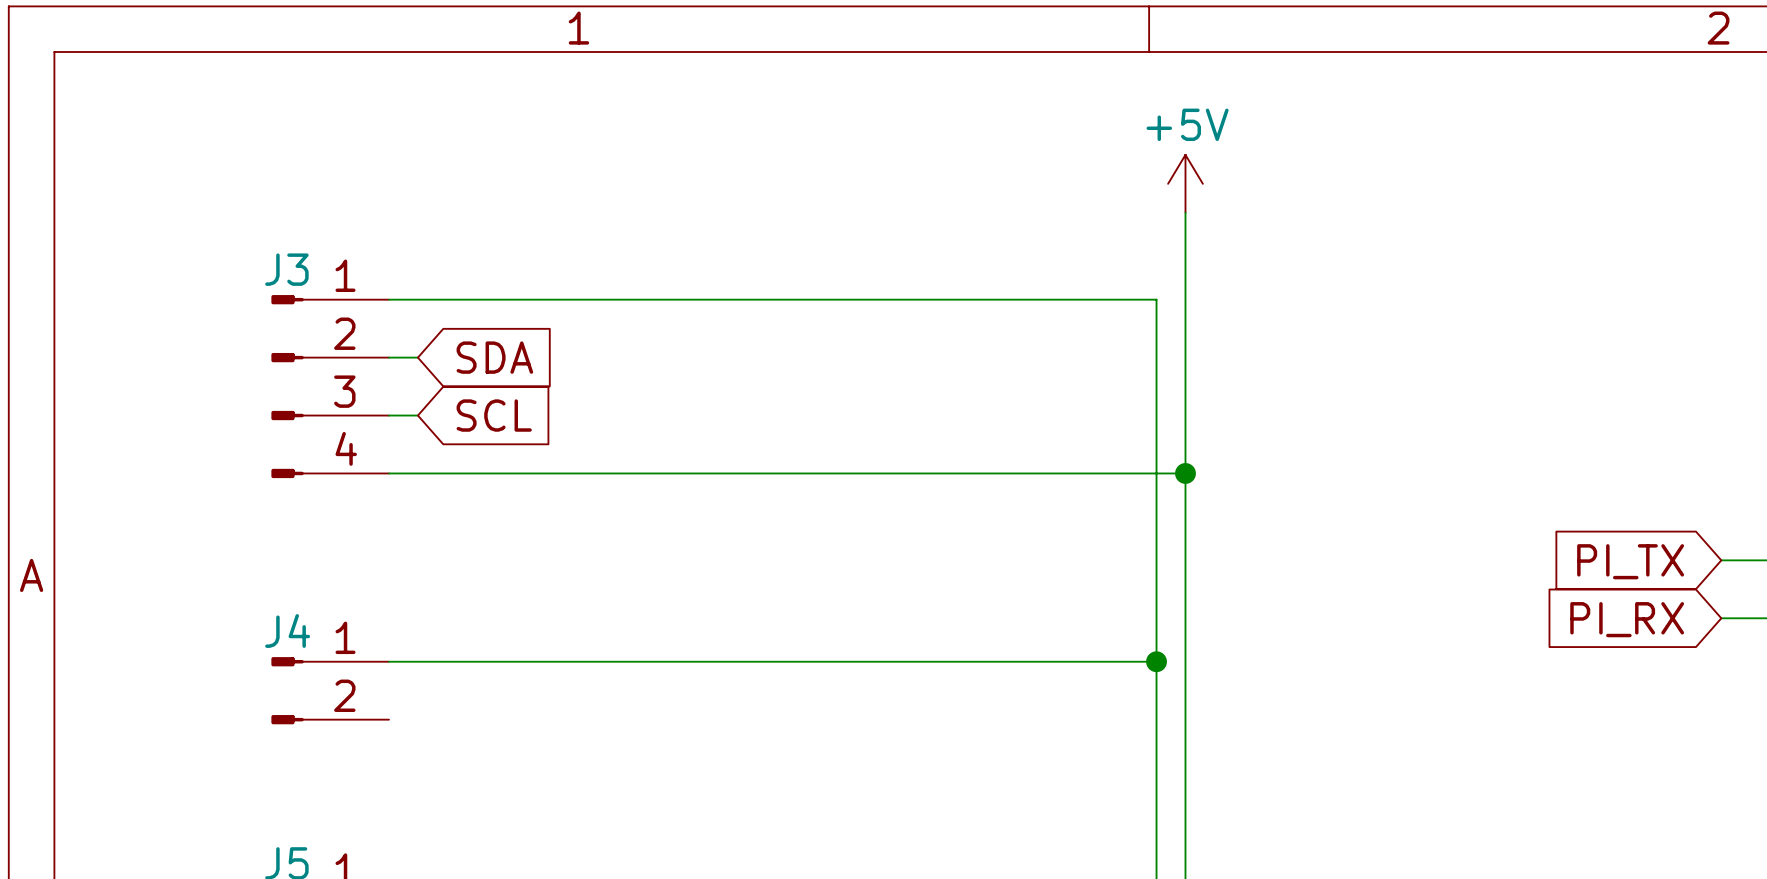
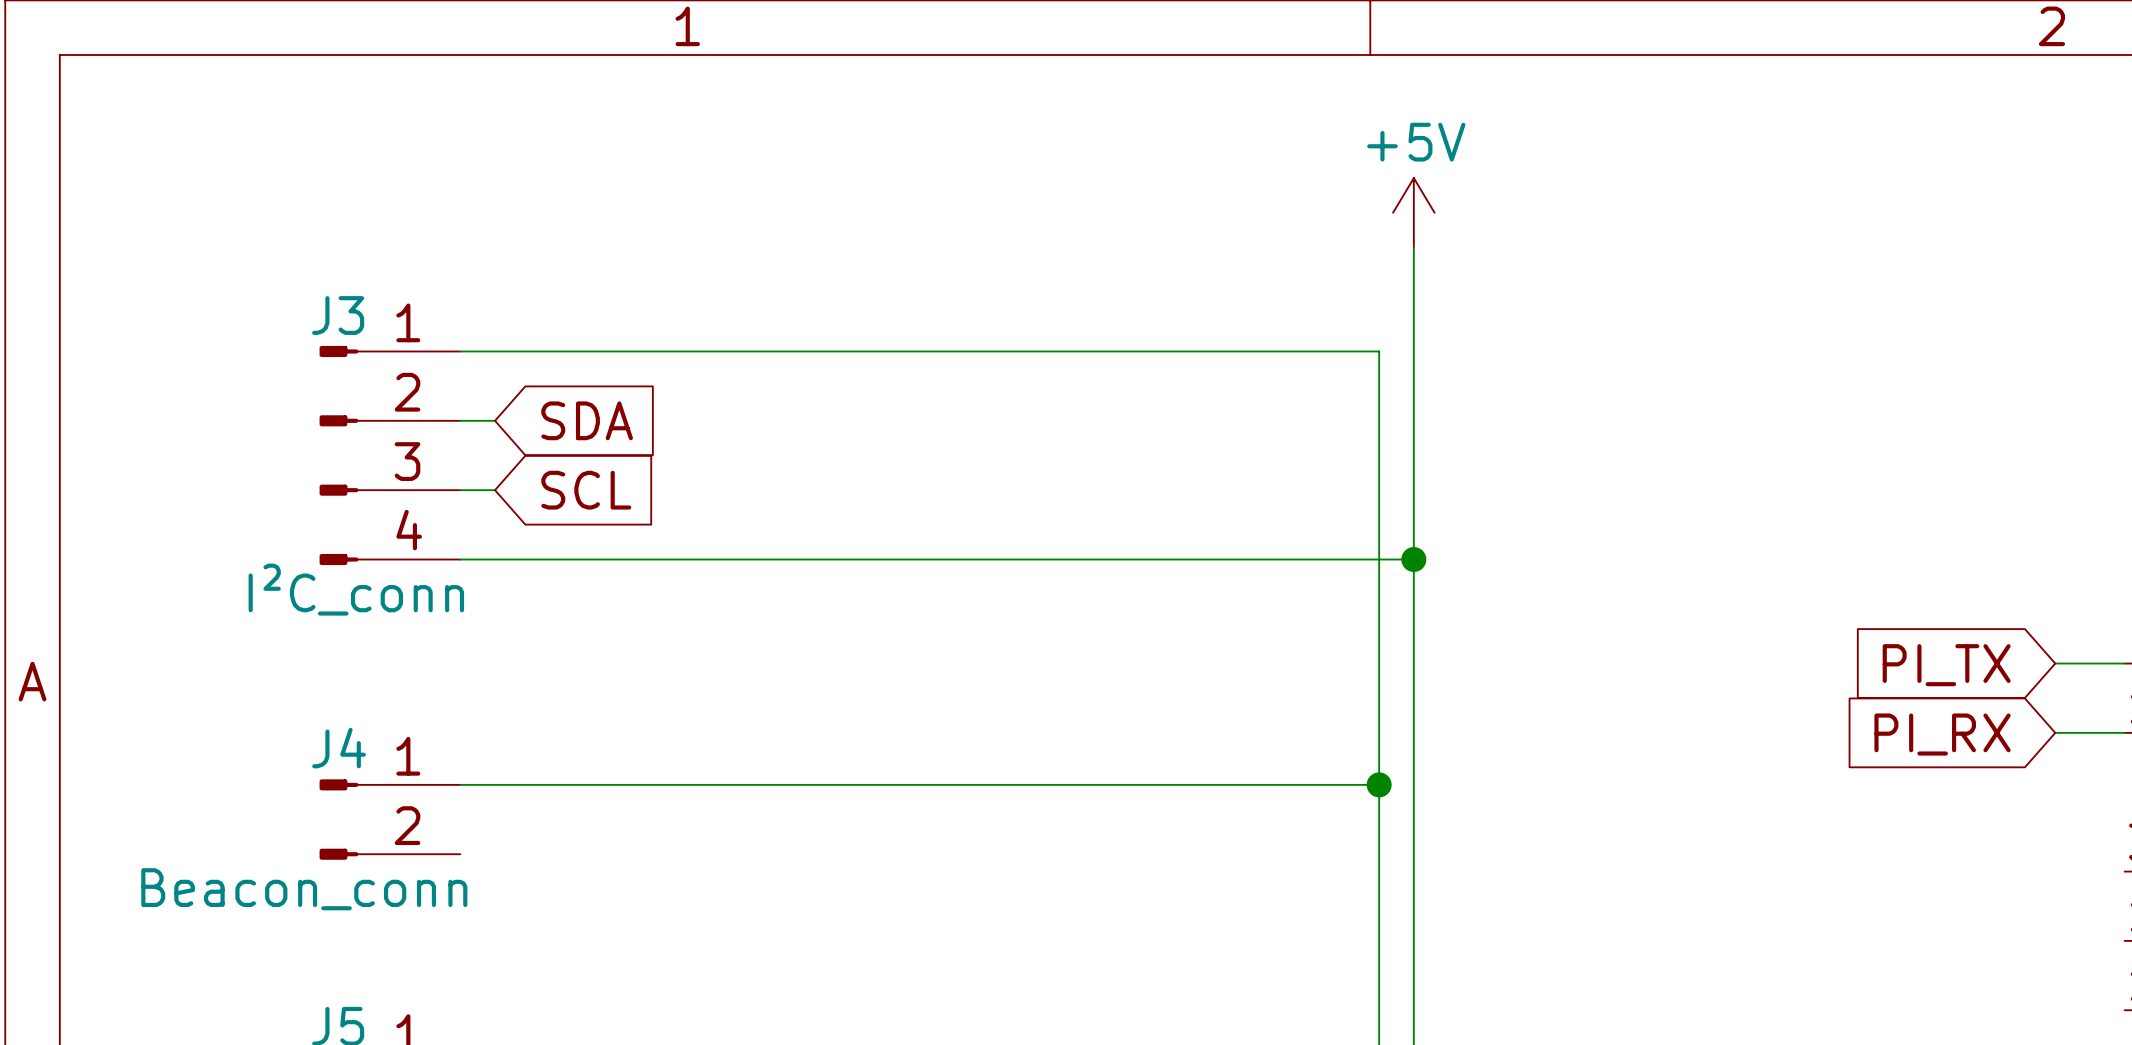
J3 value: none -> I²C_conn (356, 589)
J4 value: none -> Beacon_conn (304, 889)

